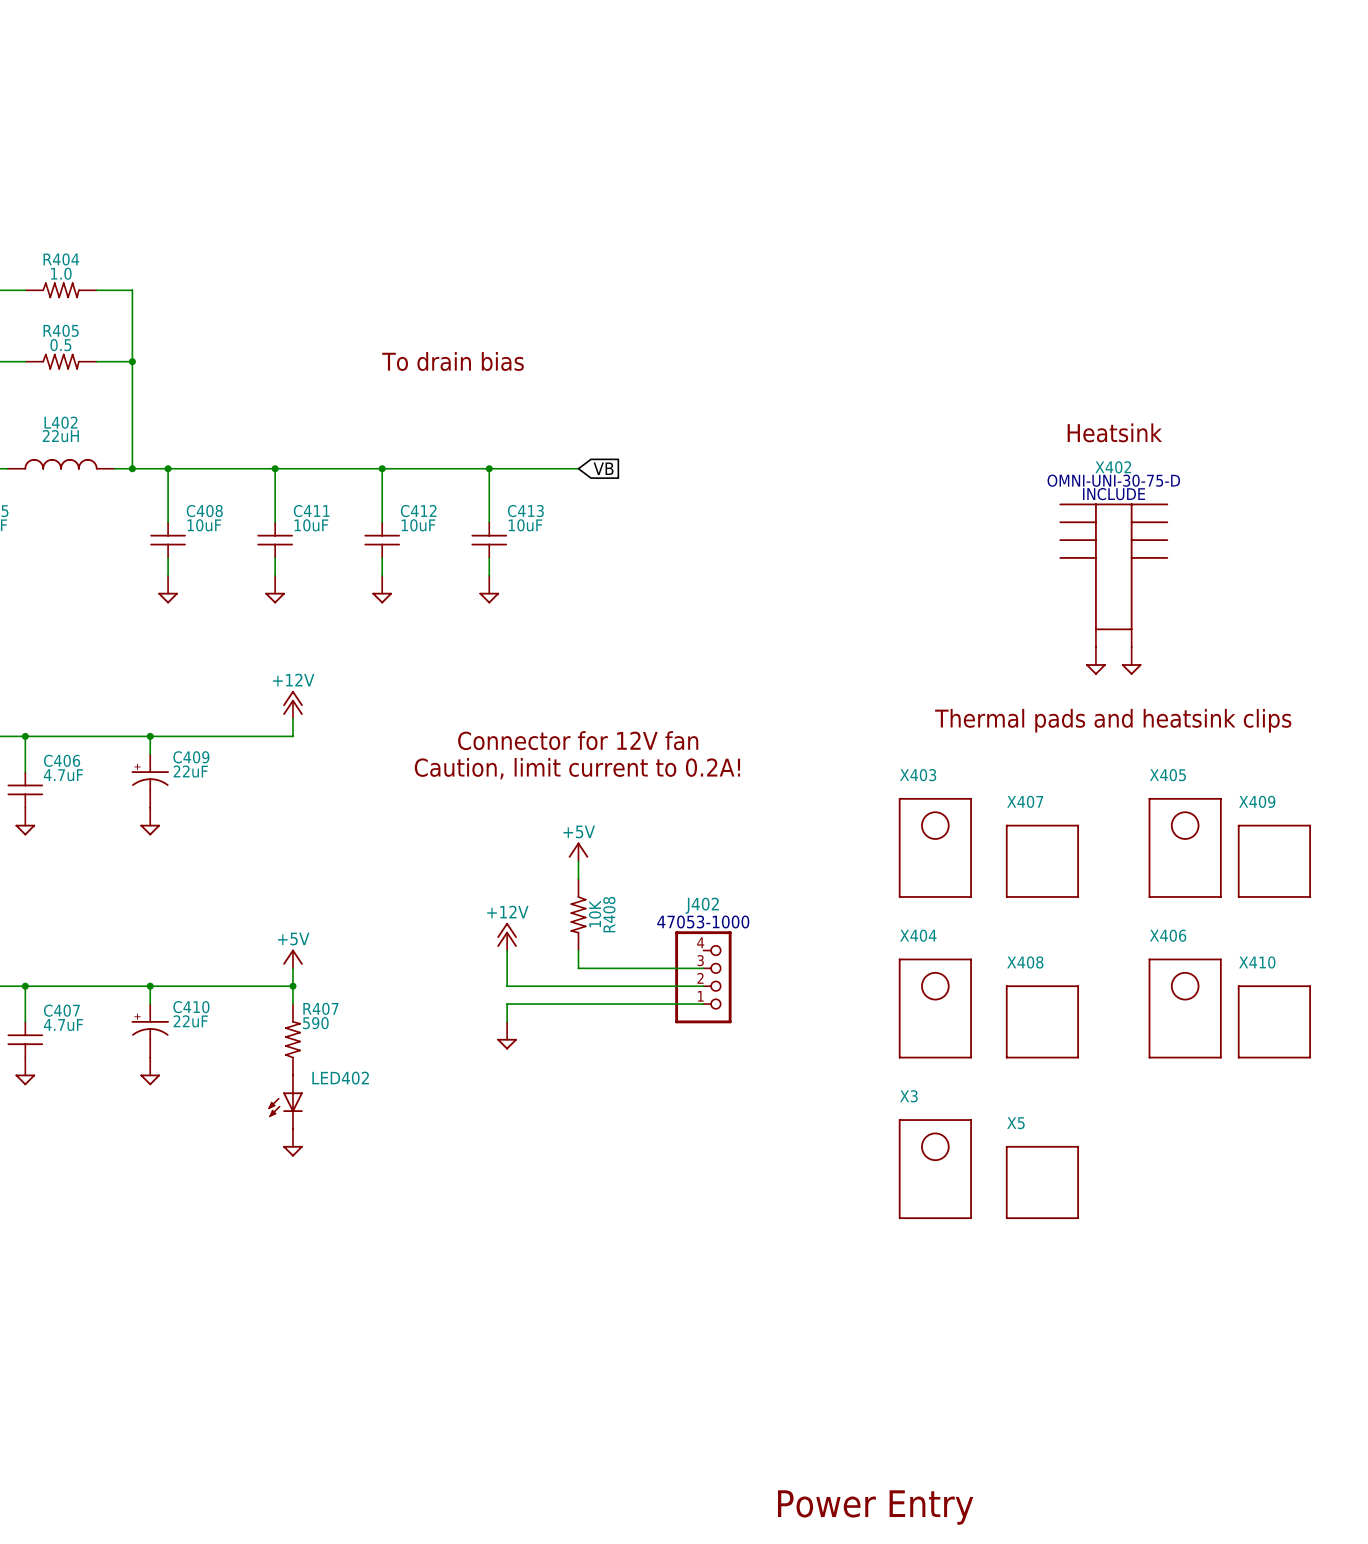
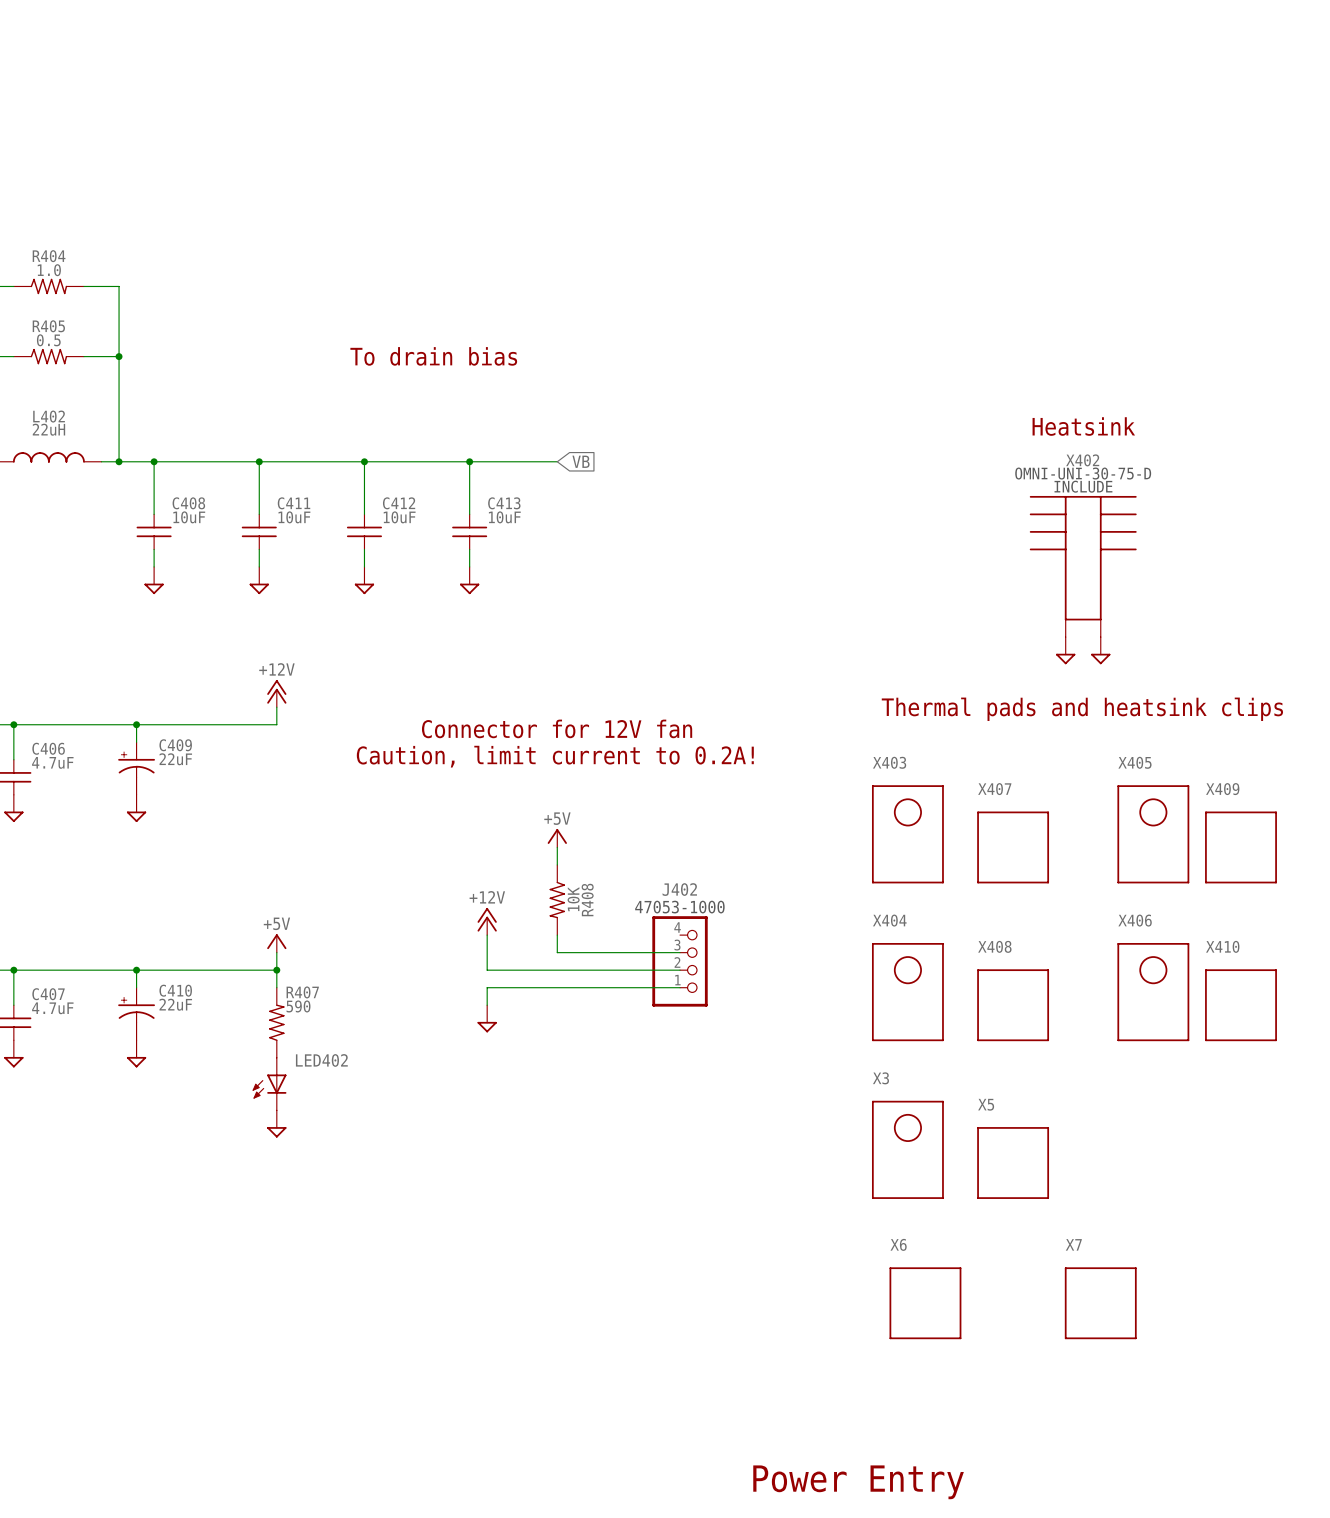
X6: none -> (925, 1303)
X7: none -> (1100, 1303)

